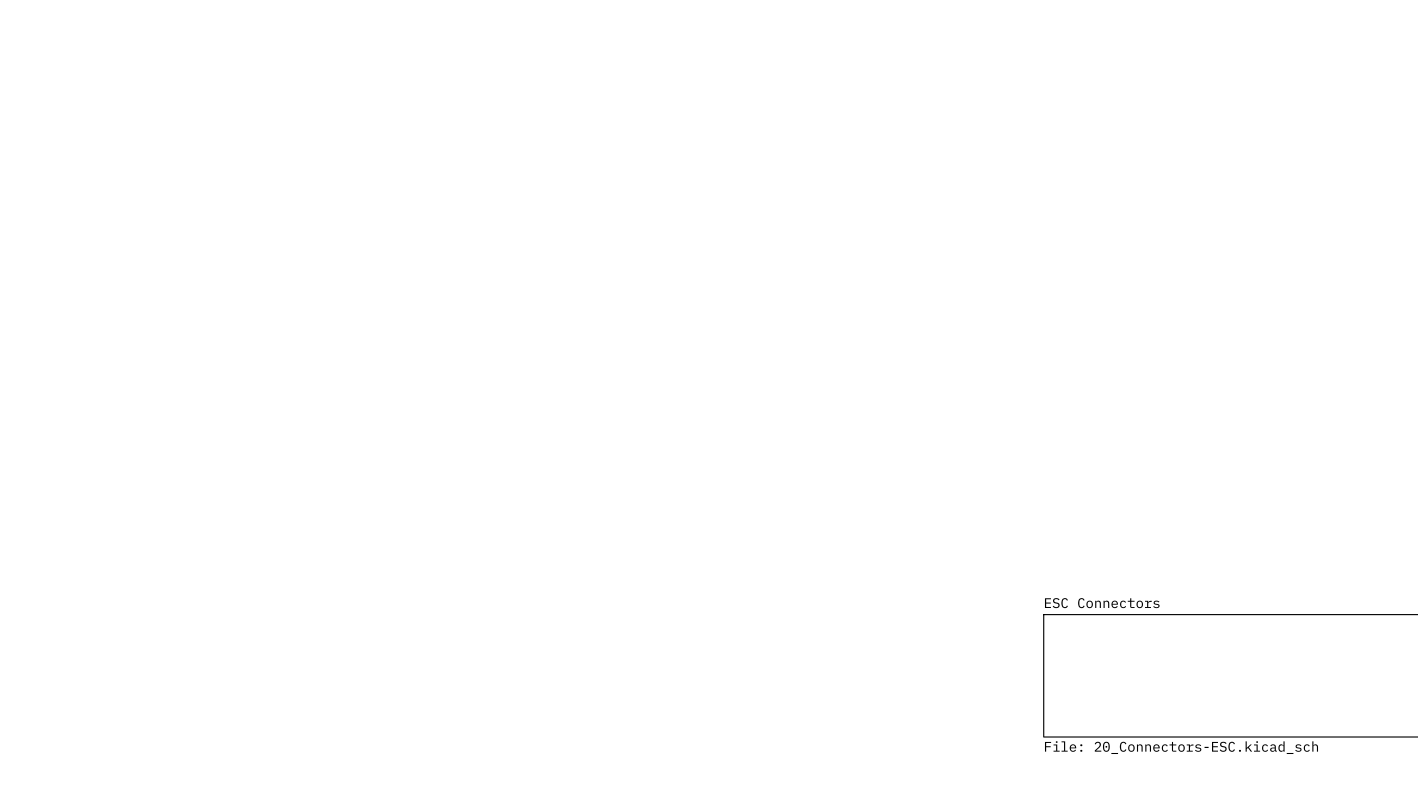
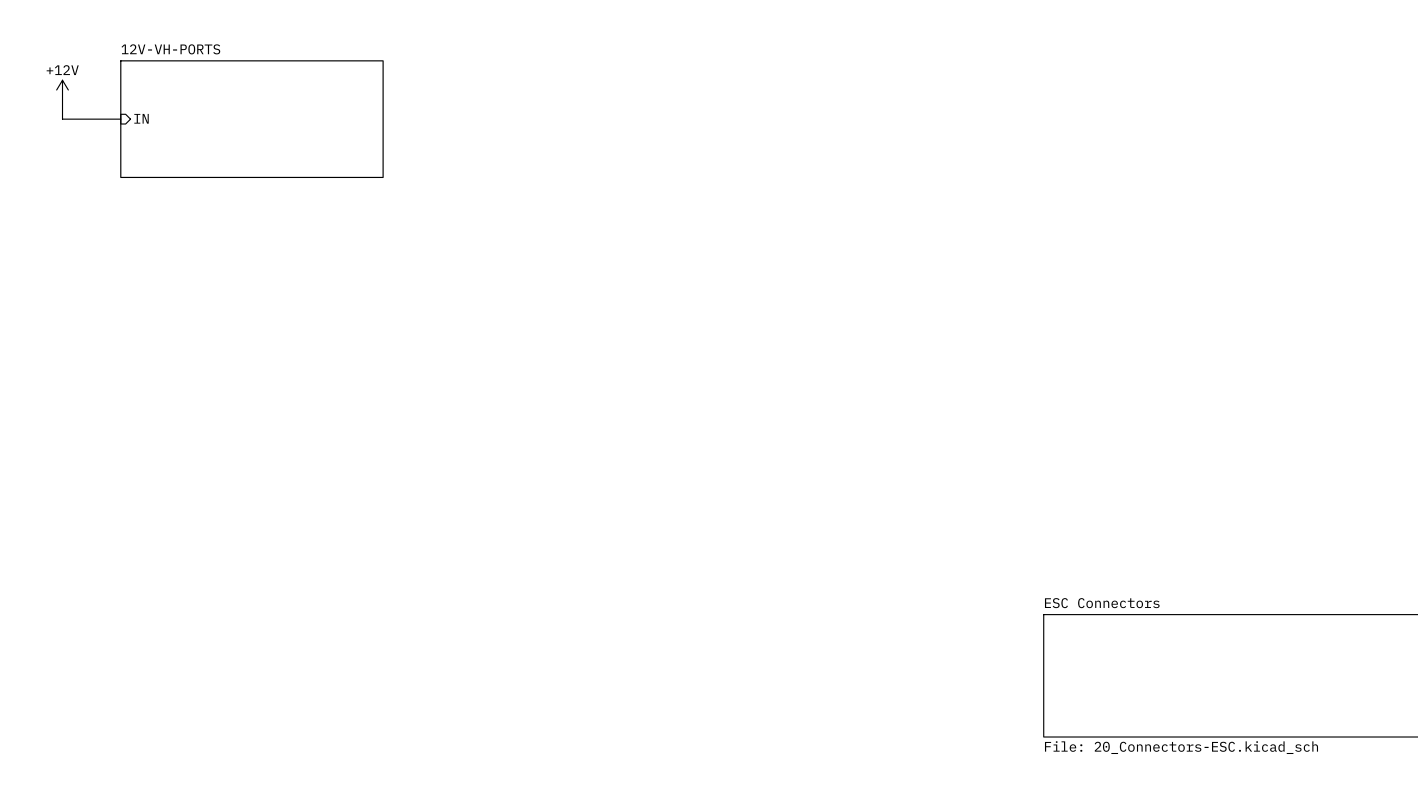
power symbol: none -> +12V (62, 90)
wire: none -> (62, 99) (62, 119) (120, 119)
sheet pin: none -> IN (141, 118)
sheet 12V-VH-PORTS: none -> (251, 119)

